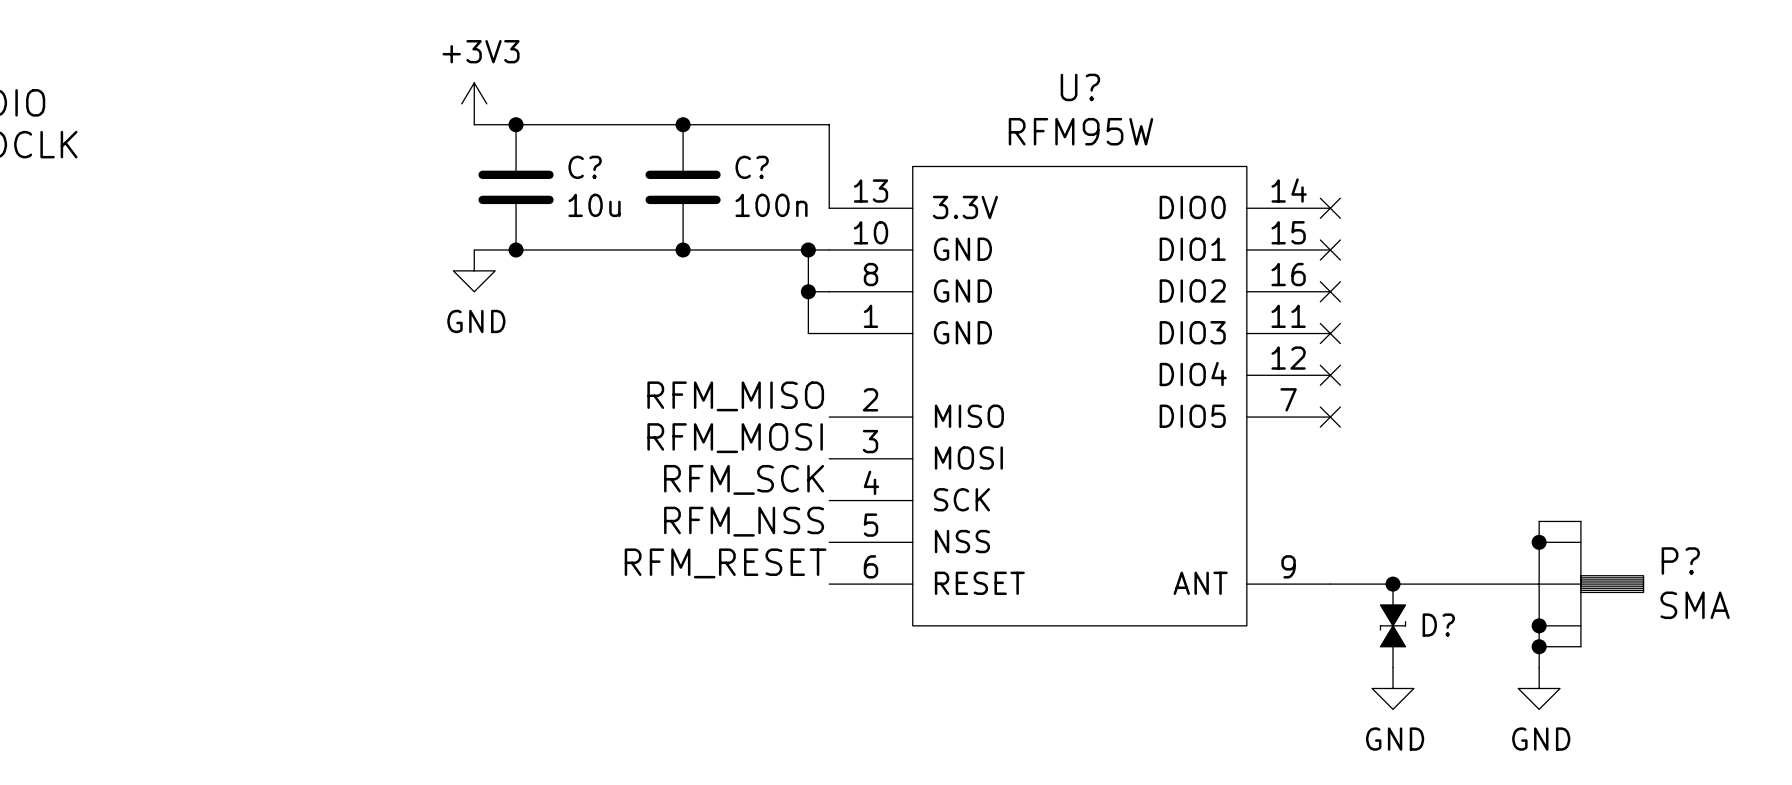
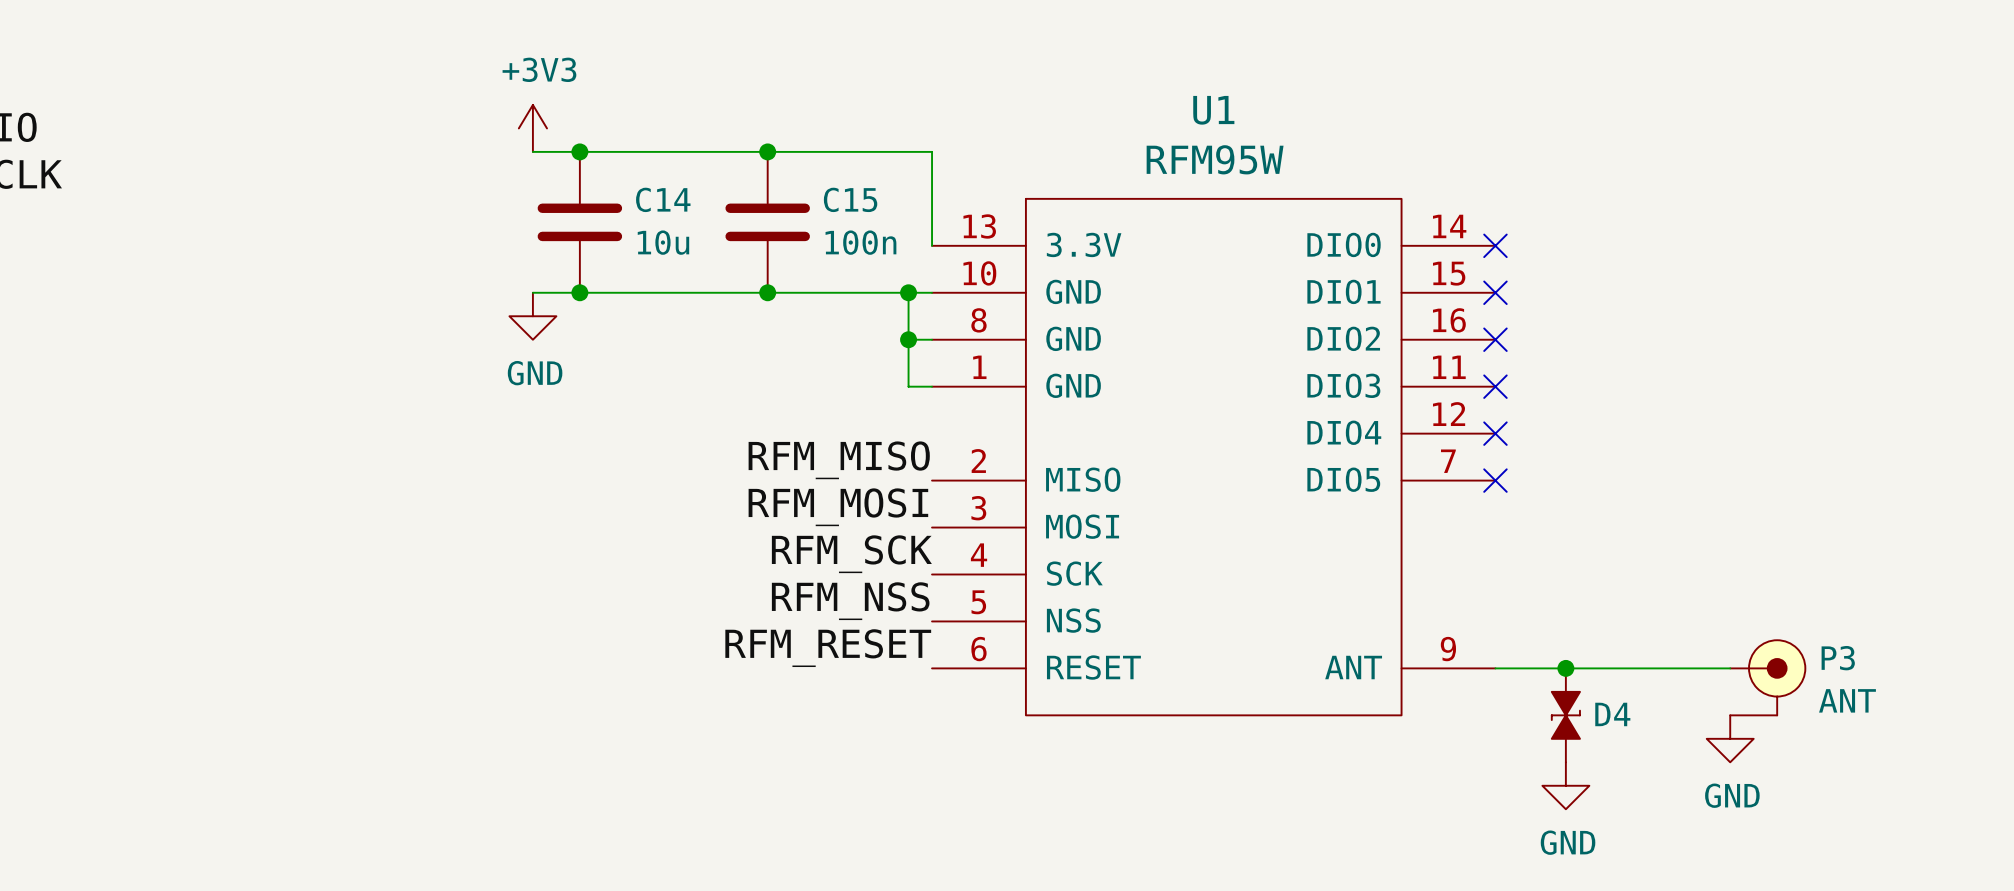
U? name: U? (1080, 87) -> U1 (1213, 110)
C? name: C? (585, 167) -> C14 (663, 199)
C? name: C? (752, 167) -> C15 (850, 199)
wire: (1539, 521) (1539, 667) -> none
junction: (1539, 542) -> none
P?: SMA (1591, 584) -> none
P3: none -> ANT (1767, 677)
D? name: D? (1438, 625) -> D4 (1612, 714)
junction: (1539, 625) -> none
junction: (1539, 646) -> none
power symbol position: GND (1539, 688) -> GND (1730, 738)

